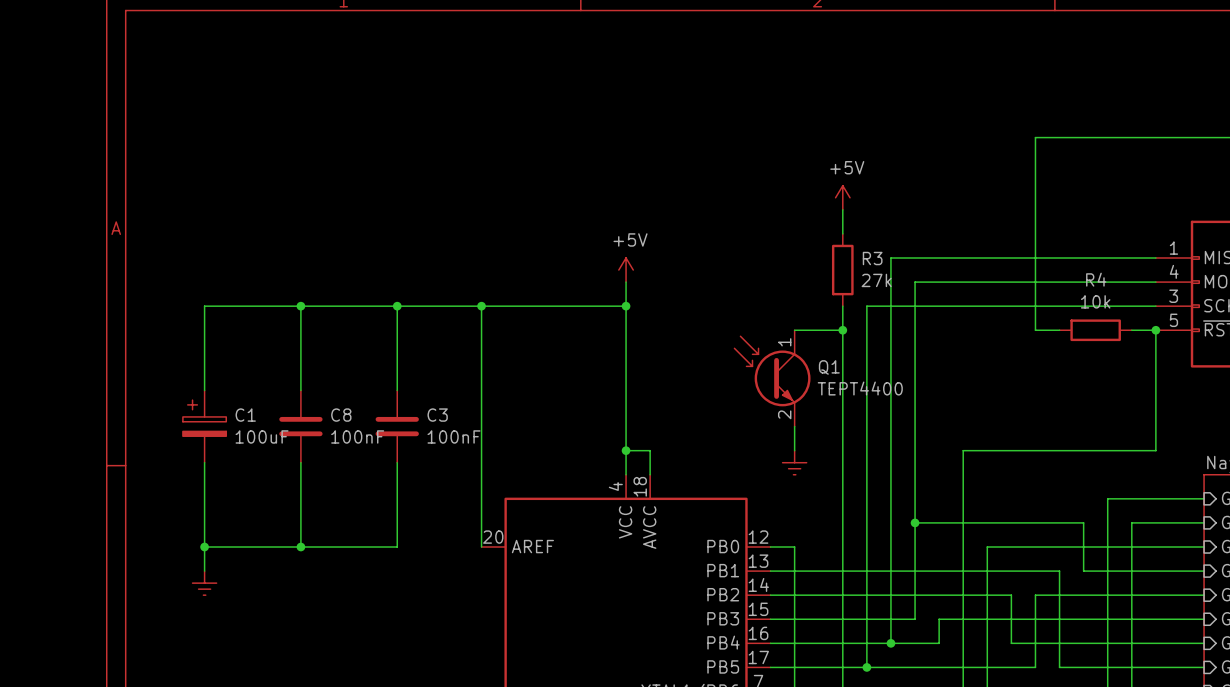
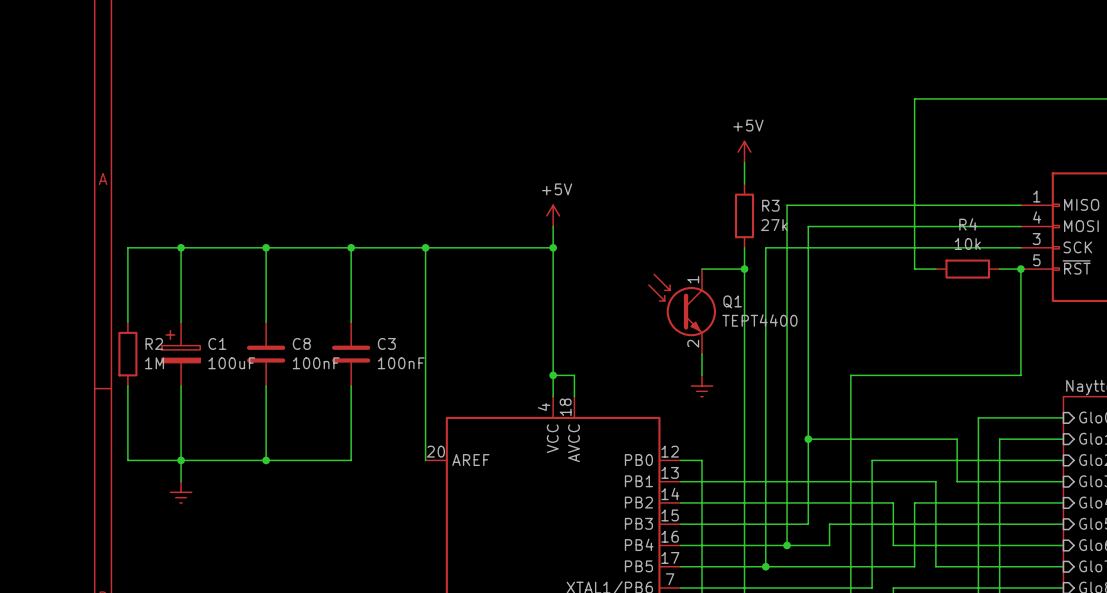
wire: none -> (181, 247) (127, 247) (127, 322)
junction: none -> (181, 247)
R2: none -> 1M (127, 354)
wire: none -> (127, 386) (127, 460) (181, 460)

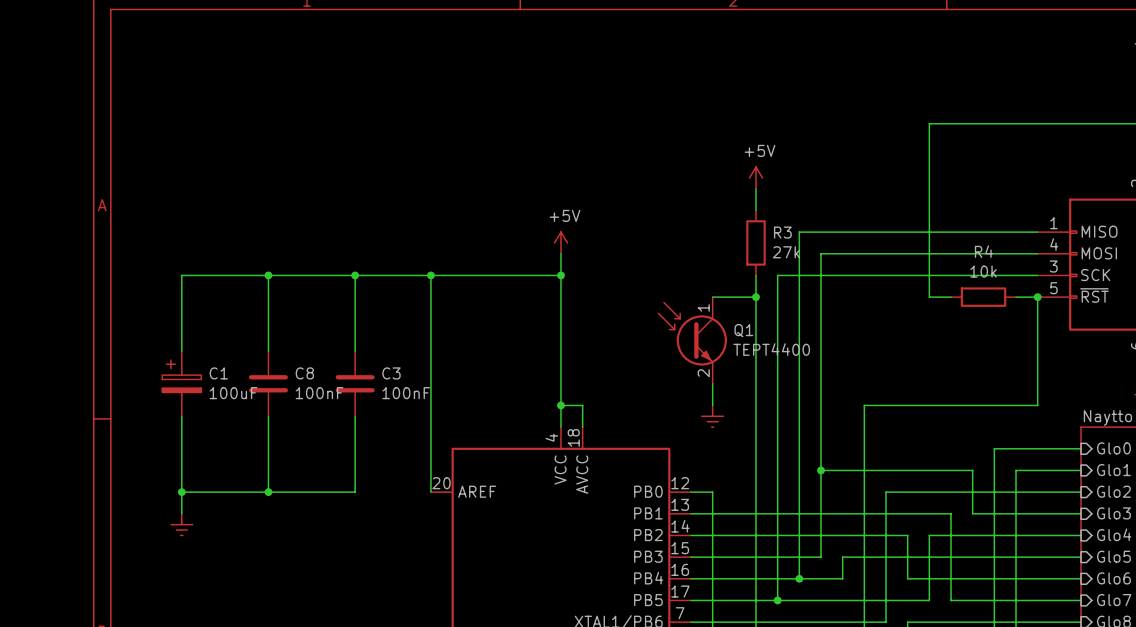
wire: (181, 247) (127, 247) (127, 322) -> none
junction: (181, 247) -> none
R2: 1M (127, 354) -> none
wire: (127, 386) (127, 460) (181, 460) -> none

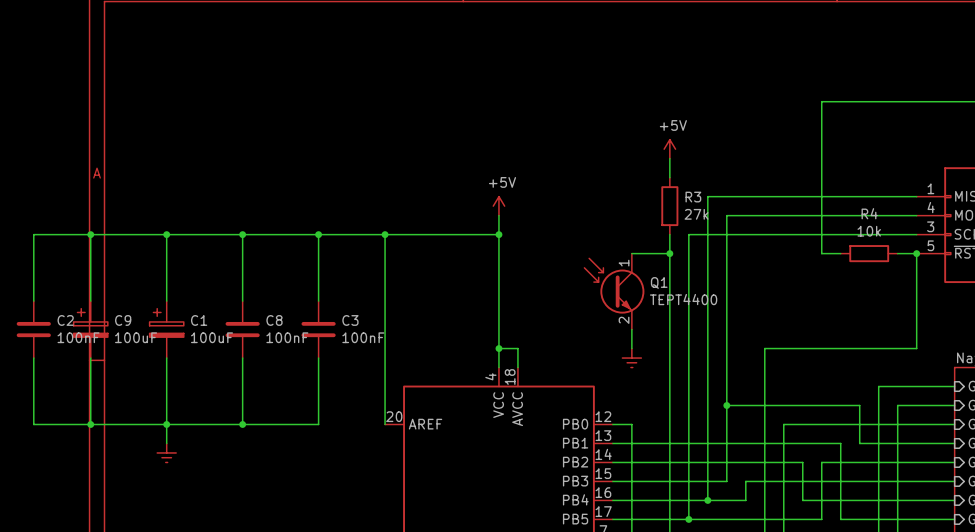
wire: none -> (90, 234) (90, 301)
junction: none -> (90, 234)
wire: none -> (166, 234) (33, 234) (33, 301)
junction: none -> (166, 234)
C2: none -> 100nF (33, 329)
C9: none -> 100uF (90, 329)
wire: none -> (33, 358) (33, 424) (166, 424)
wire: none -> (90, 358) (90, 424)
junction: none -> (90, 424)

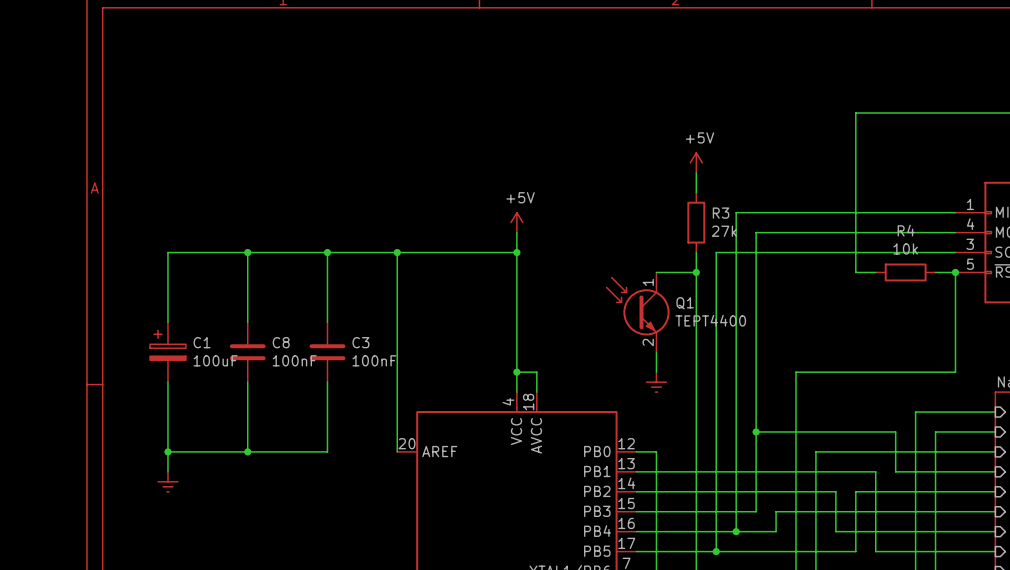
wire: (90, 234) (90, 301) -> none
junction: (90, 234) -> none
wire: (166, 234) (33, 234) (33, 301) -> none
junction: (166, 234) -> none
C2: 100nF (33, 329) -> none
C9: 100uF (90, 329) -> none
wire: (33, 358) (33, 424) (166, 424) -> none
wire: (90, 358) (90, 424) -> none
junction: (90, 424) -> none

